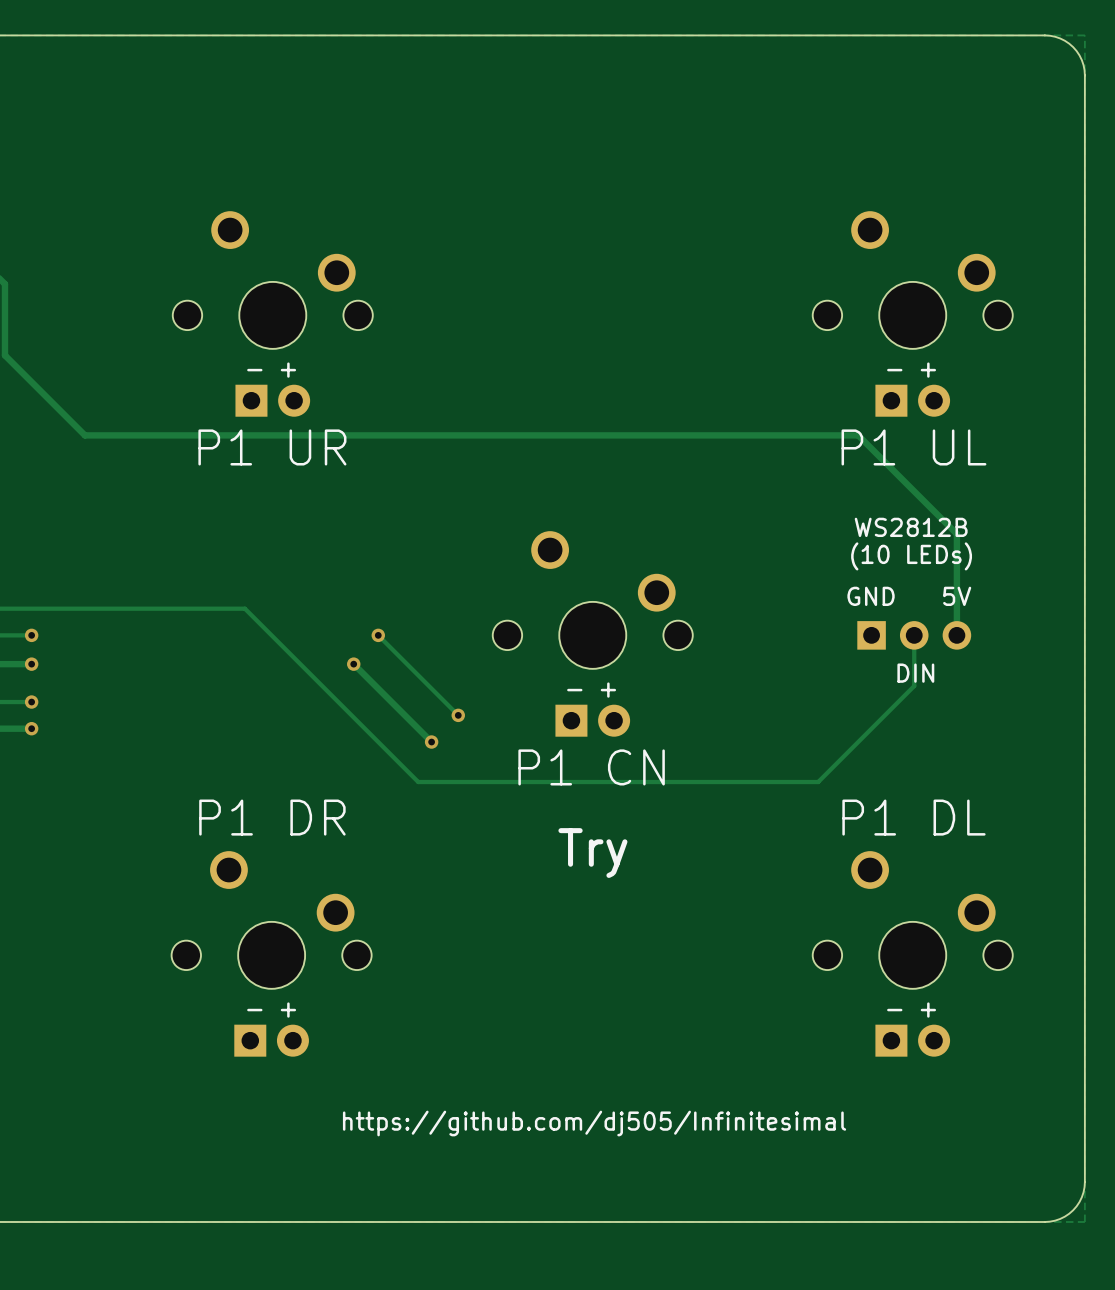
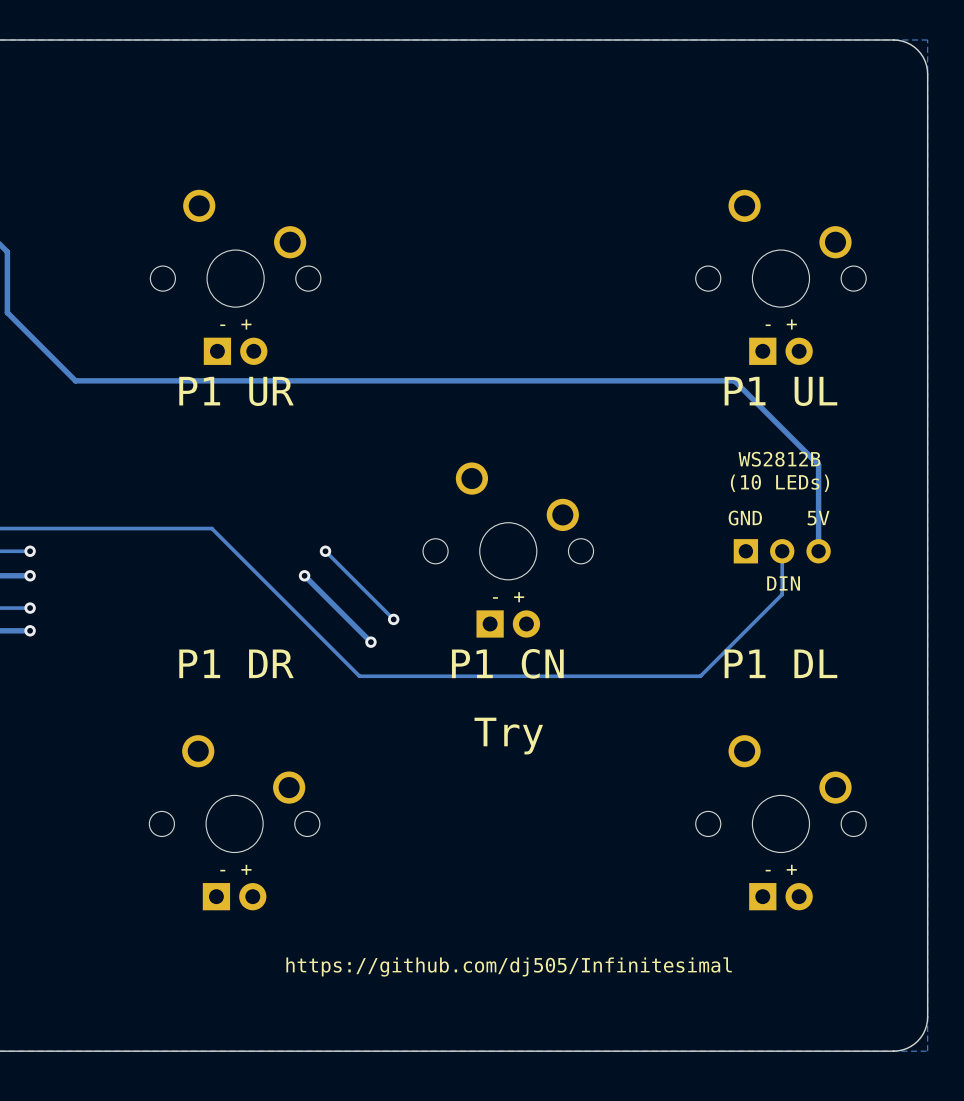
text position: P1 DR (272, 817) -> P1 DR (236, 663)
text position: P1 DL (913, 817) -> P1 DL (780, 663)

